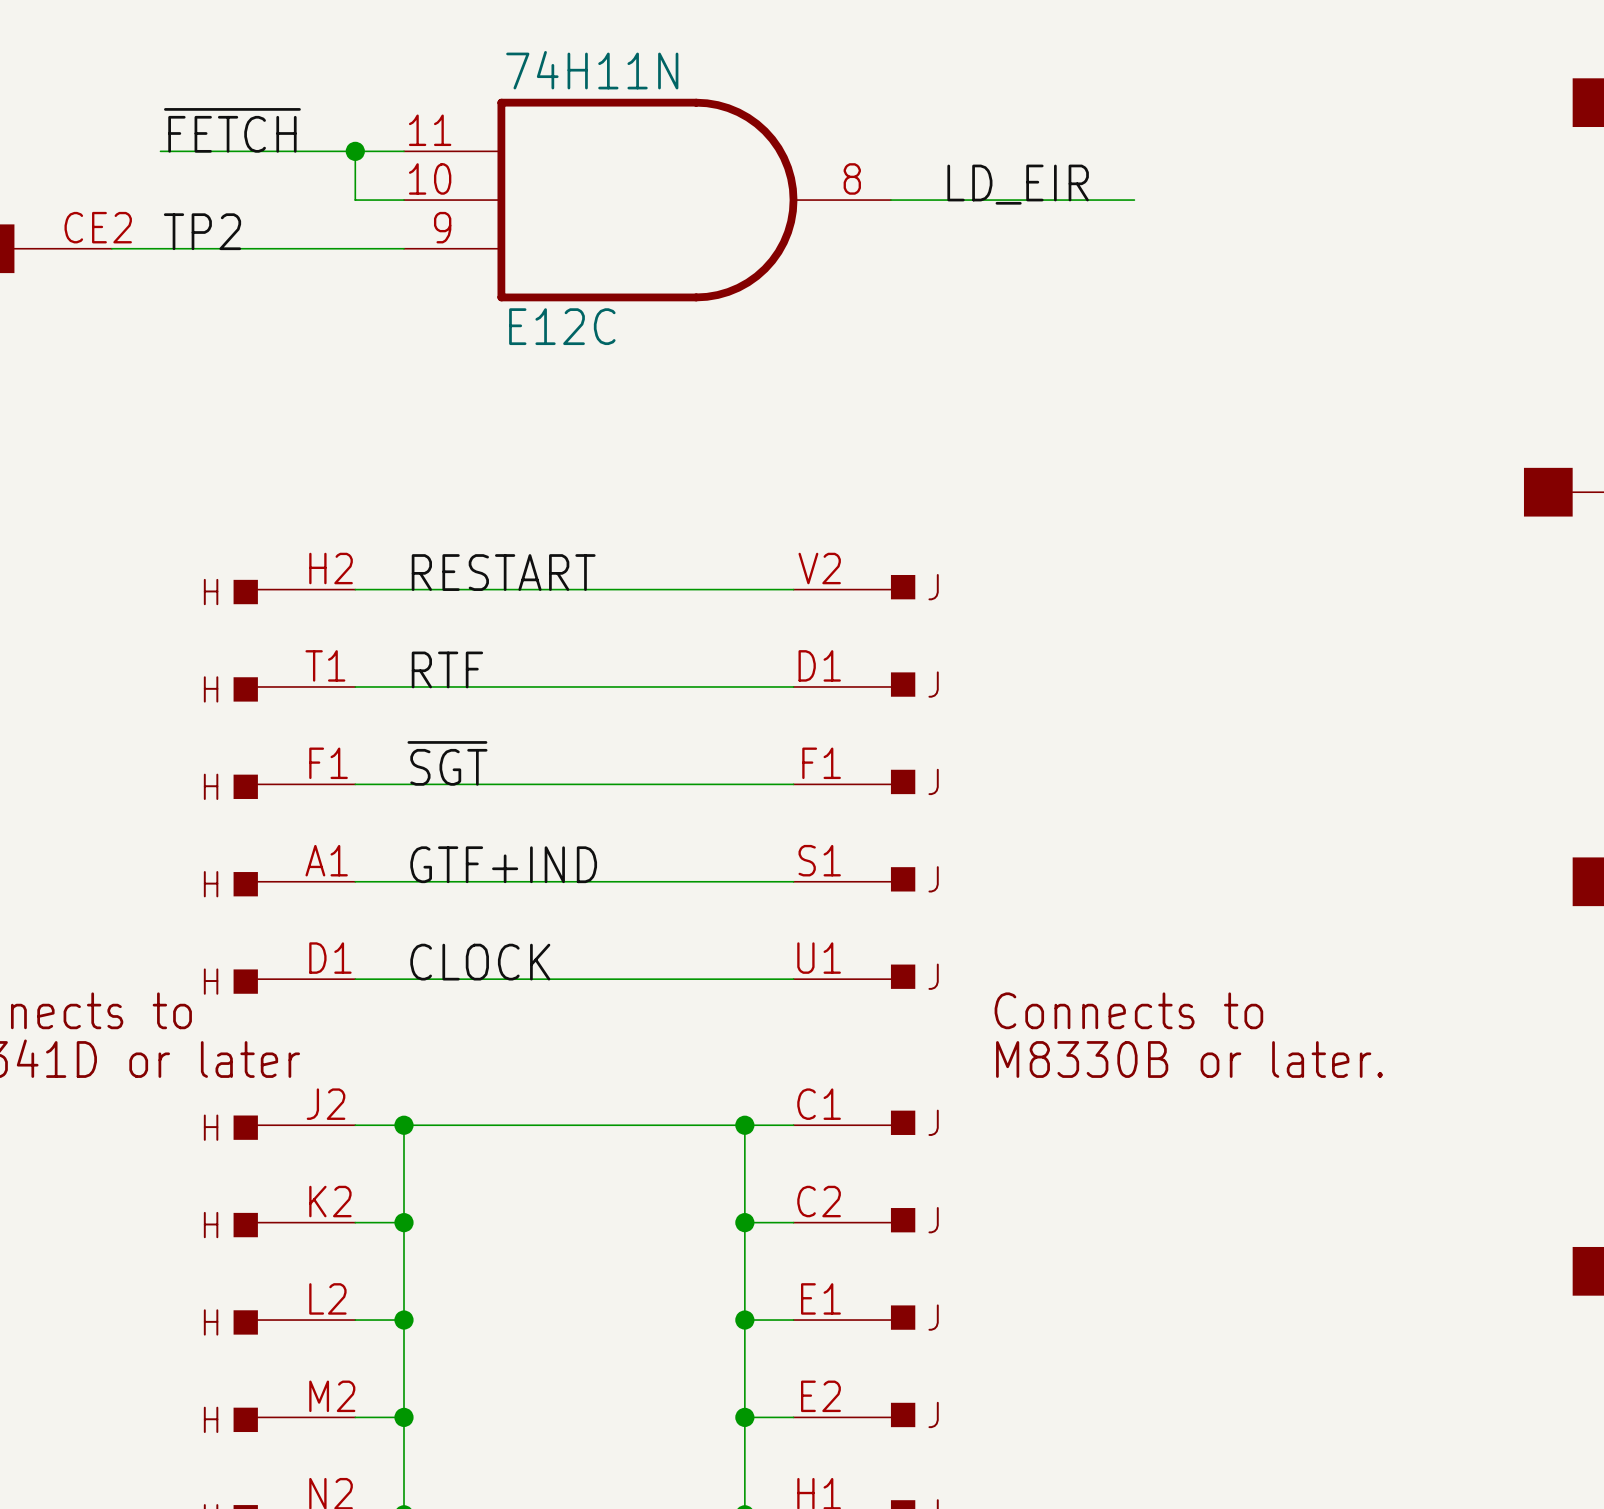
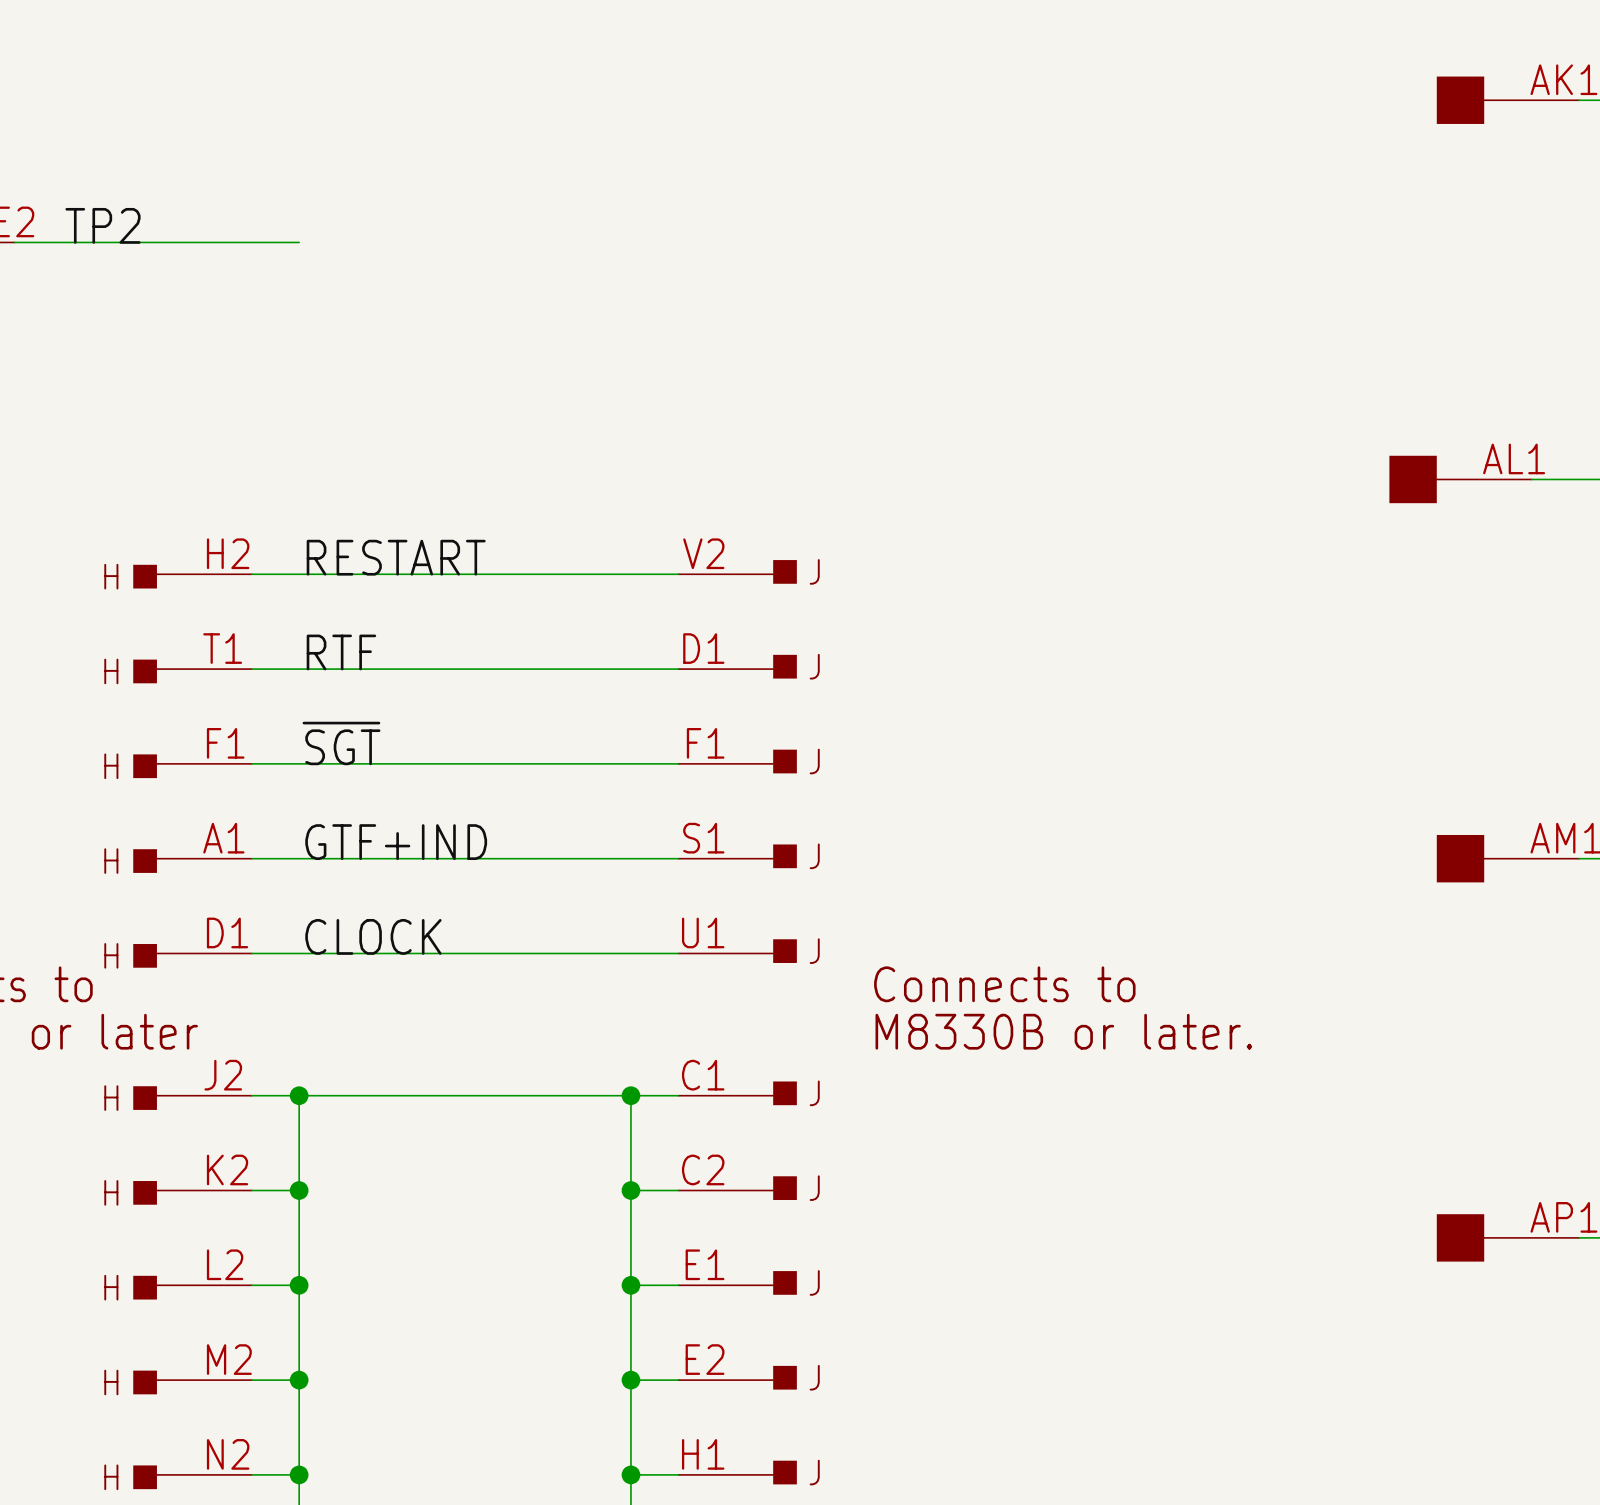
label: ~{FETCH} (232, 130) -> none
wire: (160, 151) (403, 151) -> none
wire: (355, 151) (355, 200) (403, 200) -> none
junction: (355, 151) -> none
label: LD_EIR (1018, 184) -> none
E12C: 74H11N (647, 200) -> none
wire: (890, 200) (1134, 200) -> none

